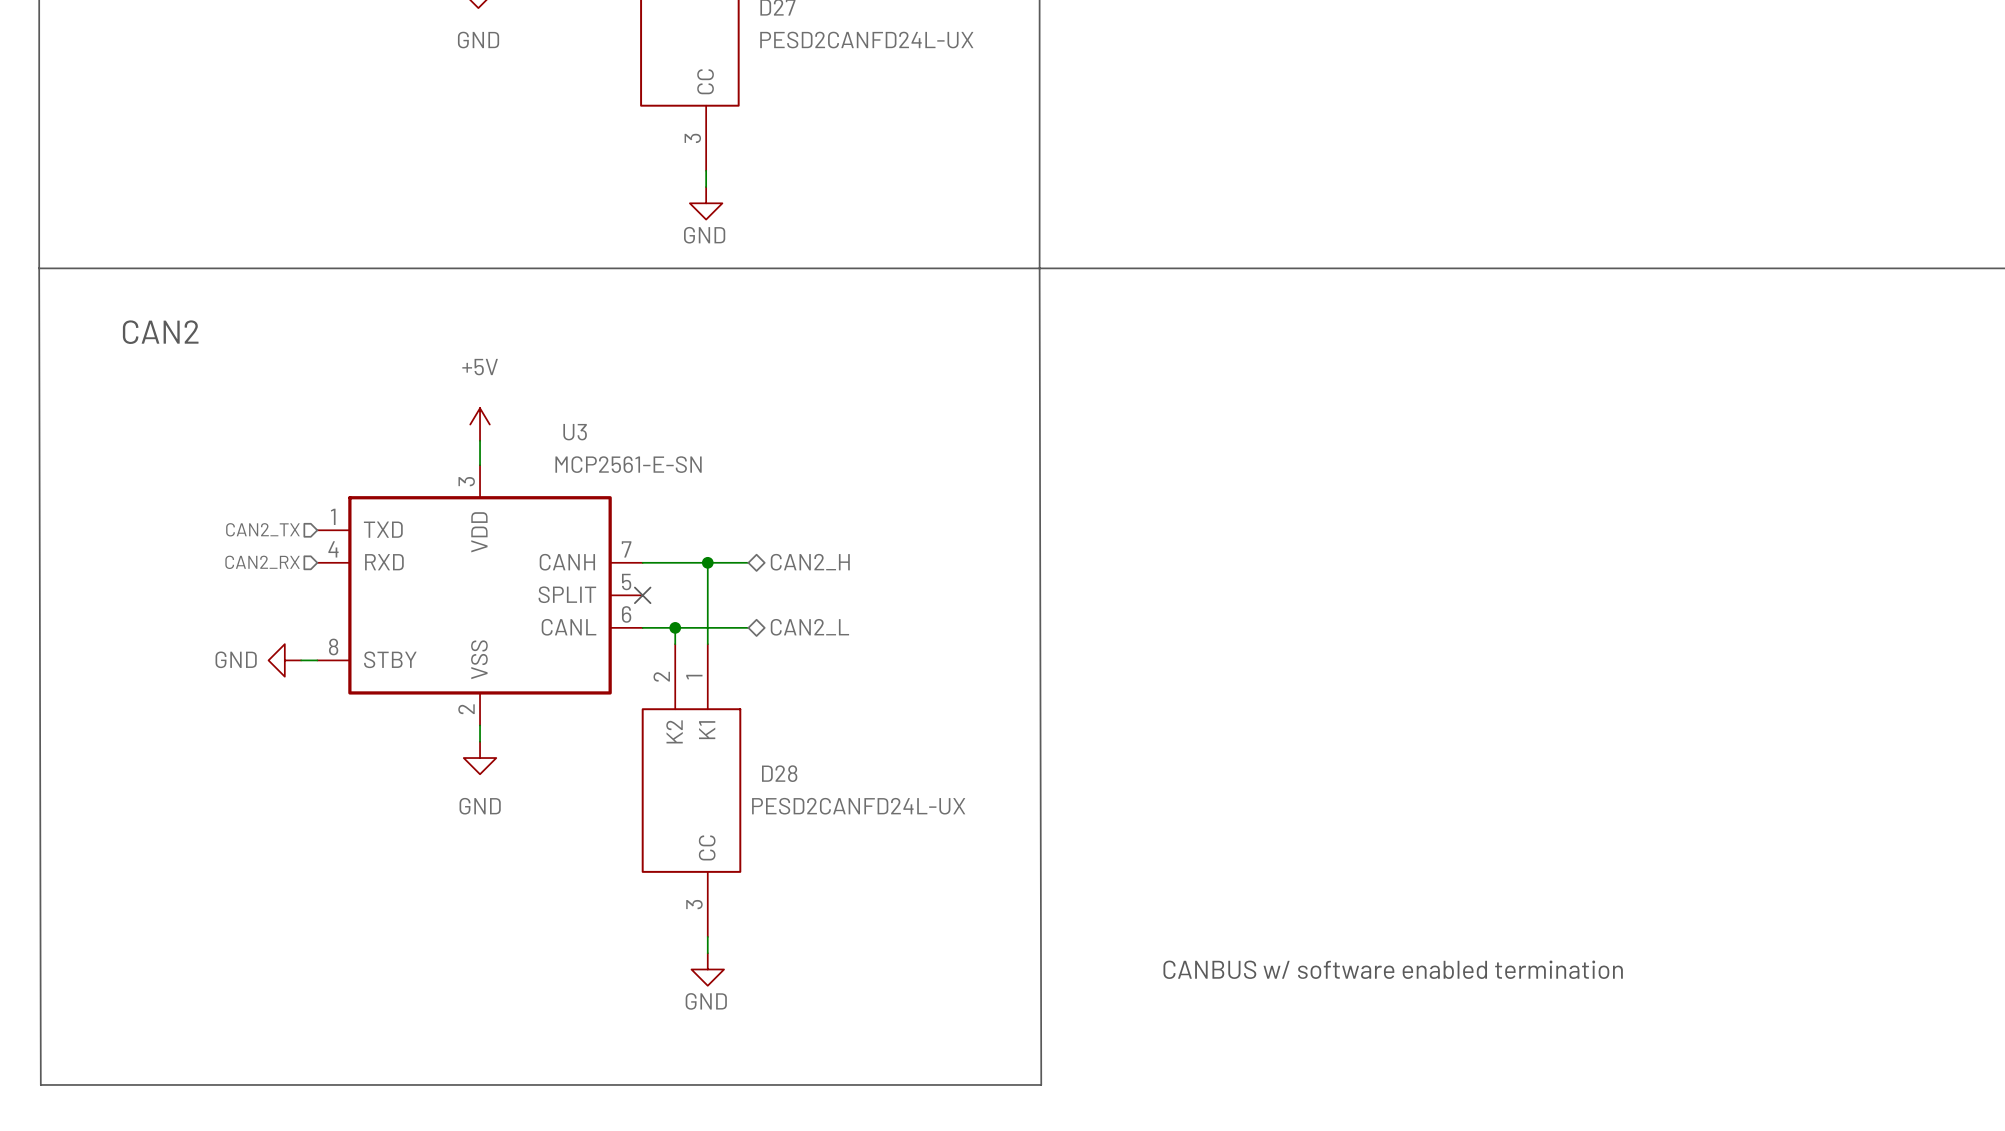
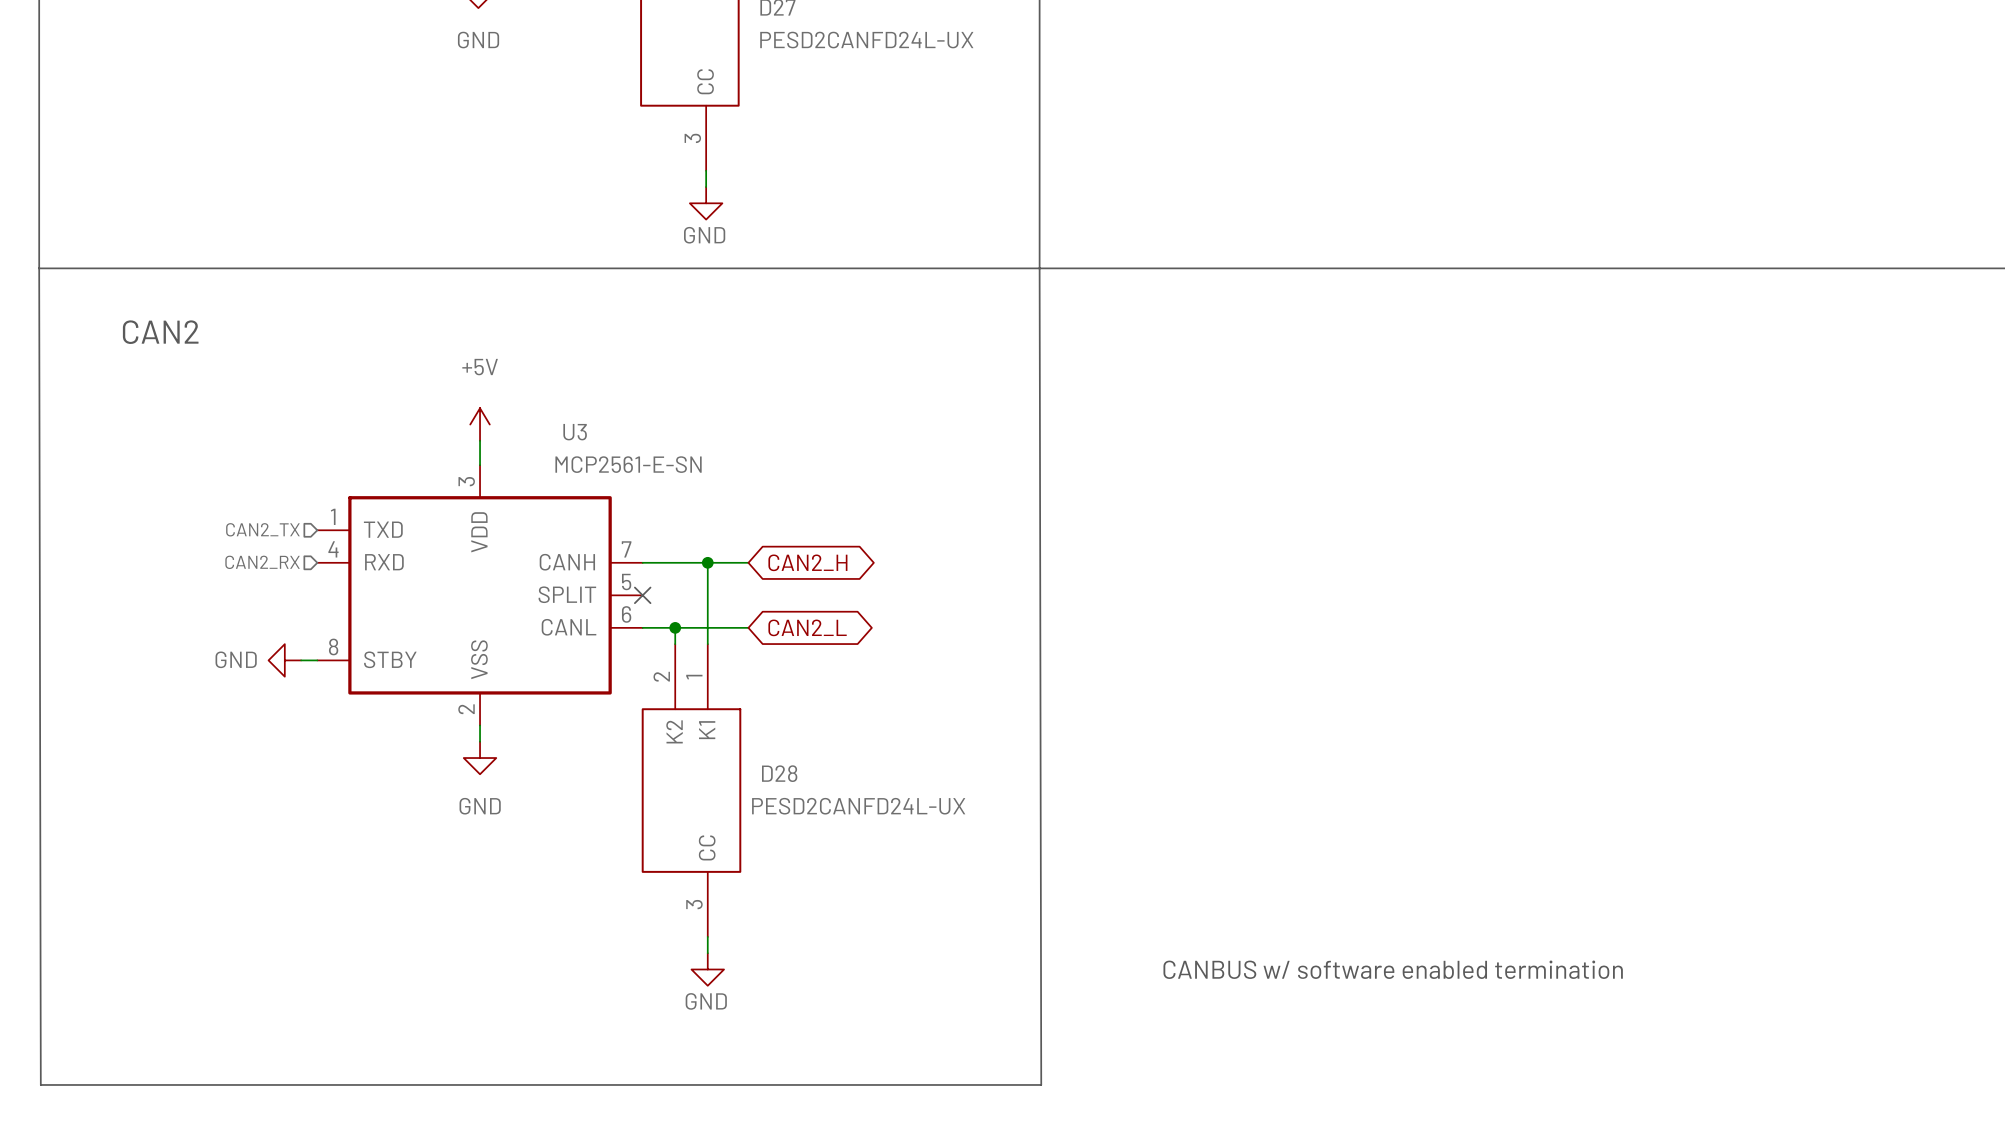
global label: none -> CAN2_H (807, 562)
hierarchical label: CAN2_H (810, 562) -> none
global label: none -> CAN2_L (807, 627)
hierarchical label: CAN2_L (809, 627) -> none

